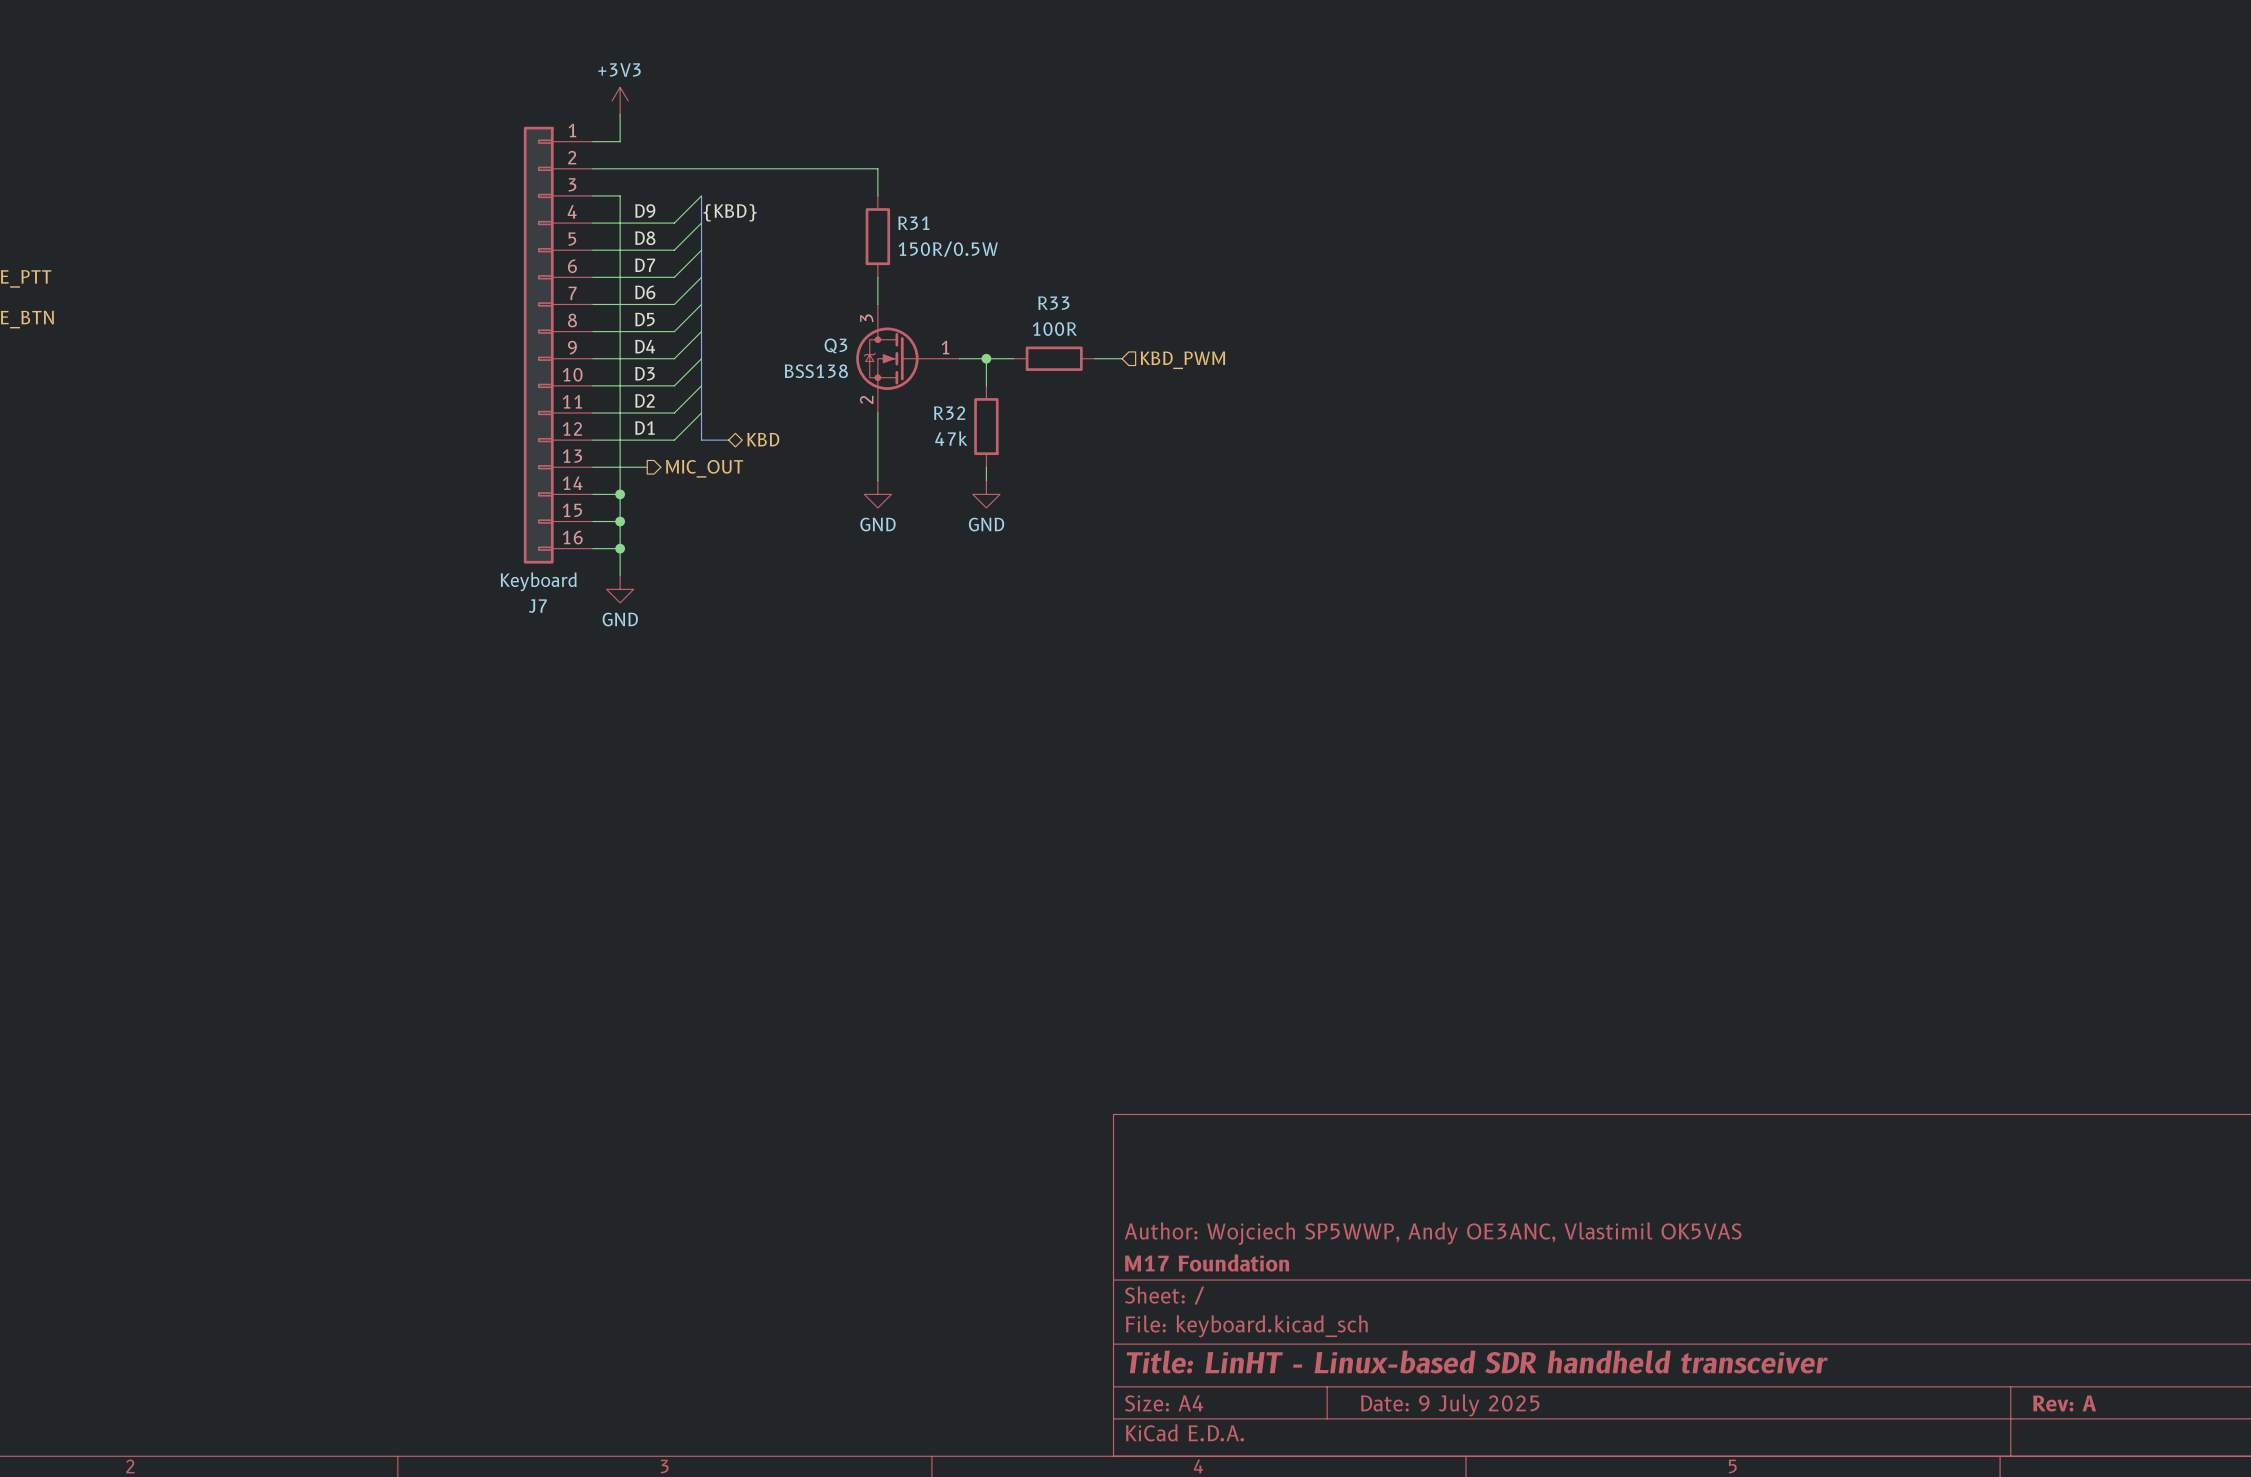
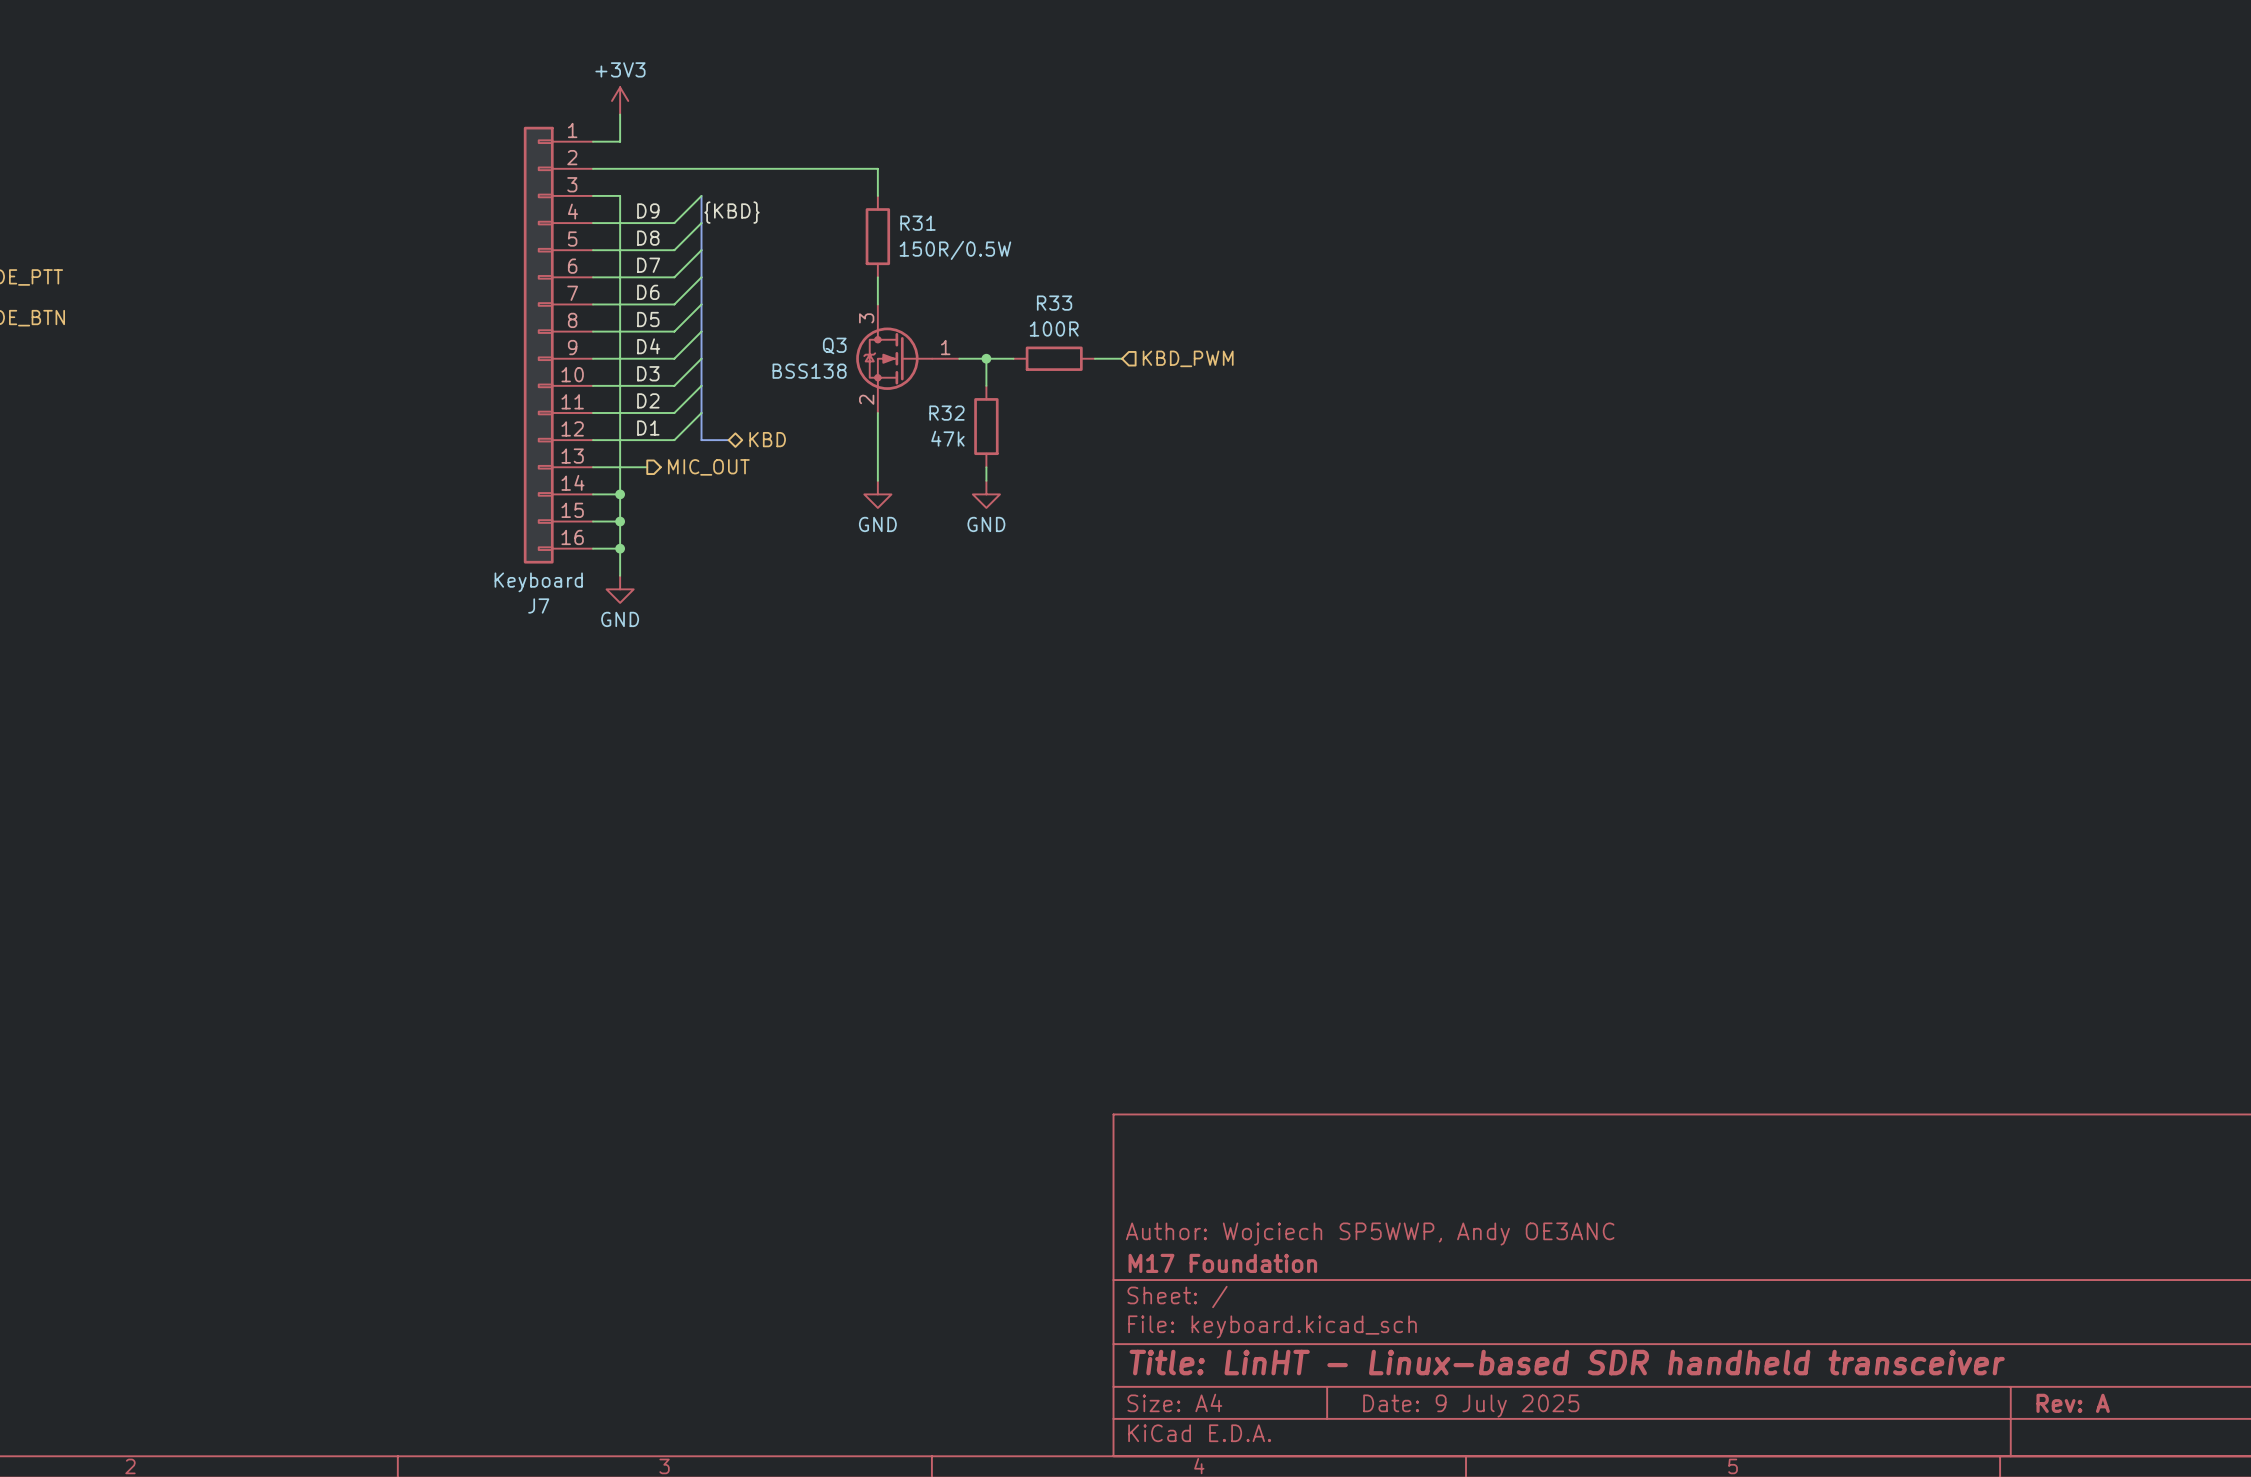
title block: Author: Wojciech SP5WWP, Andy OE3ANC, Vlastimil OK5VAS (1433, 1233) -> Author: Wojciech SP5WWP, Andy OE3ANC (1370, 1234)

